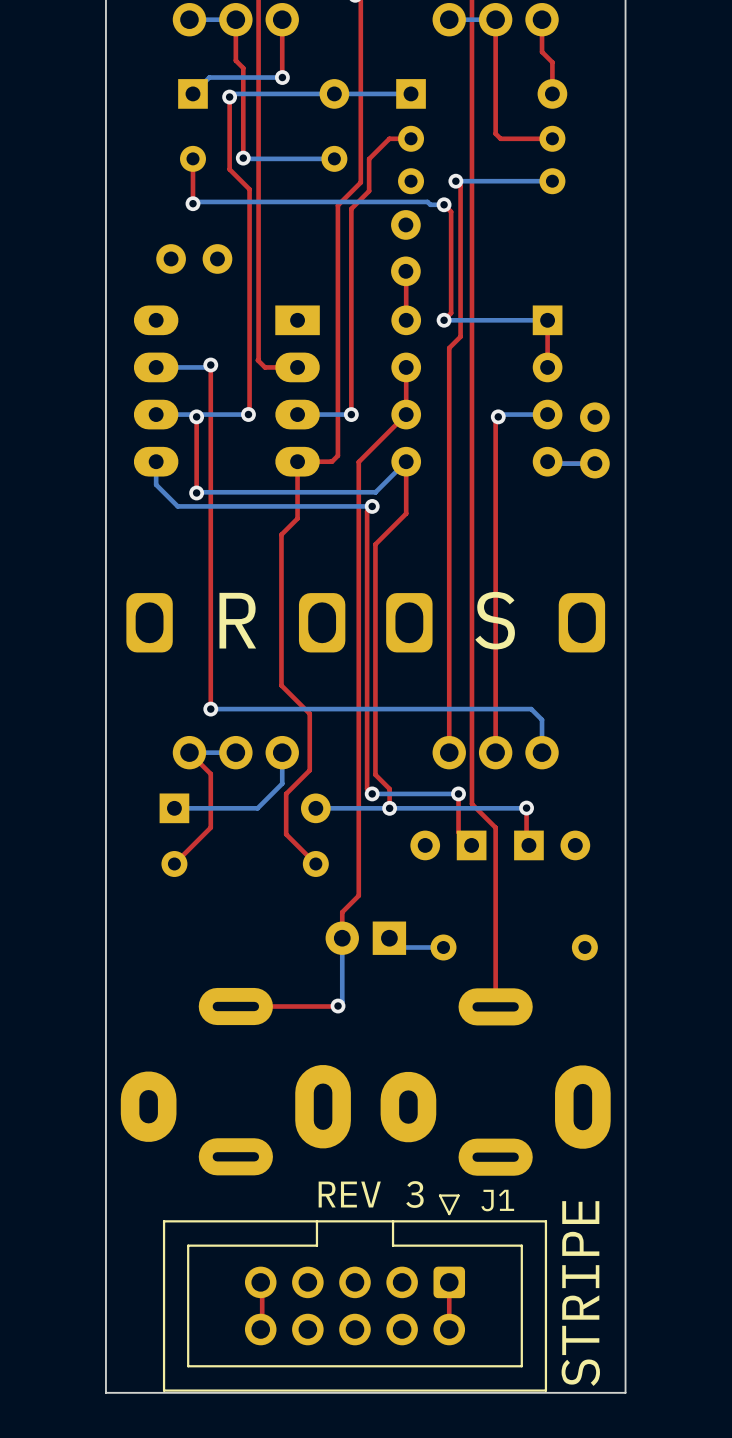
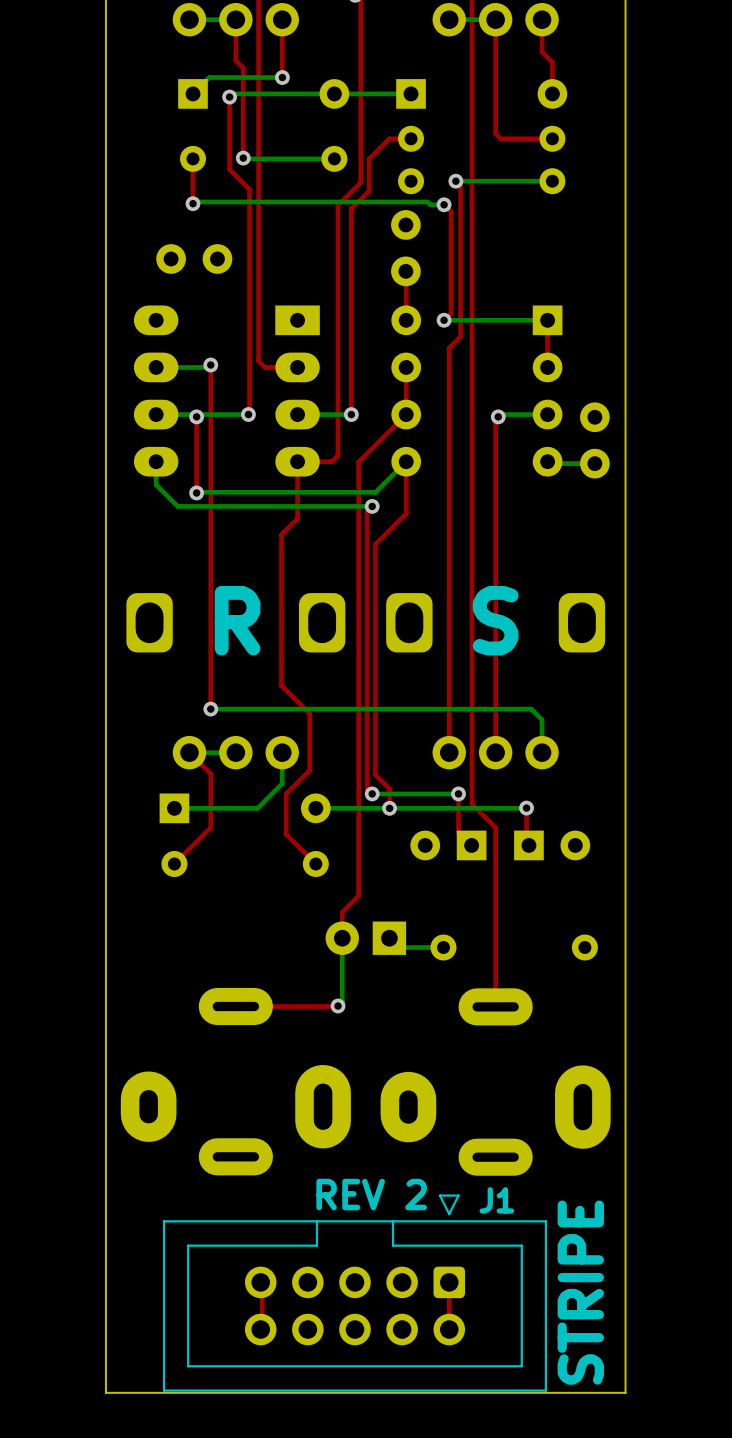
text: REV 3 (371, 1194) -> REV 2 (371, 1194)

